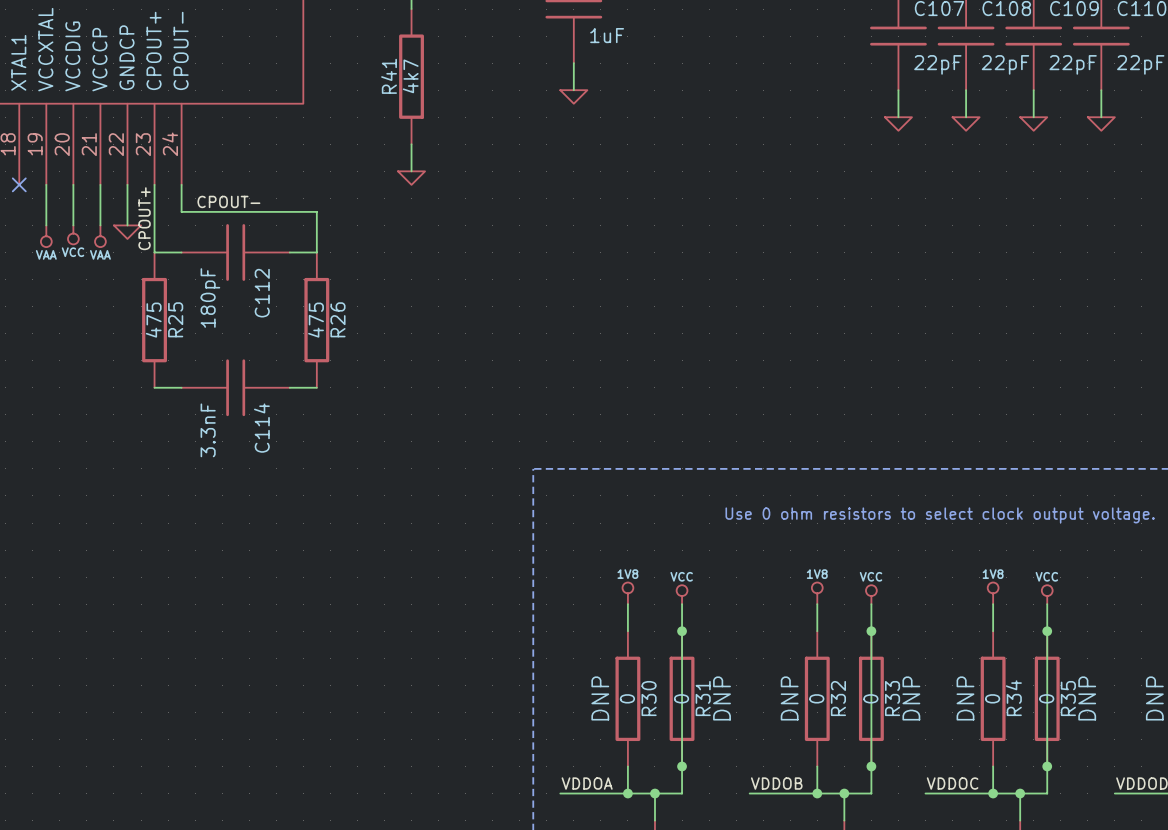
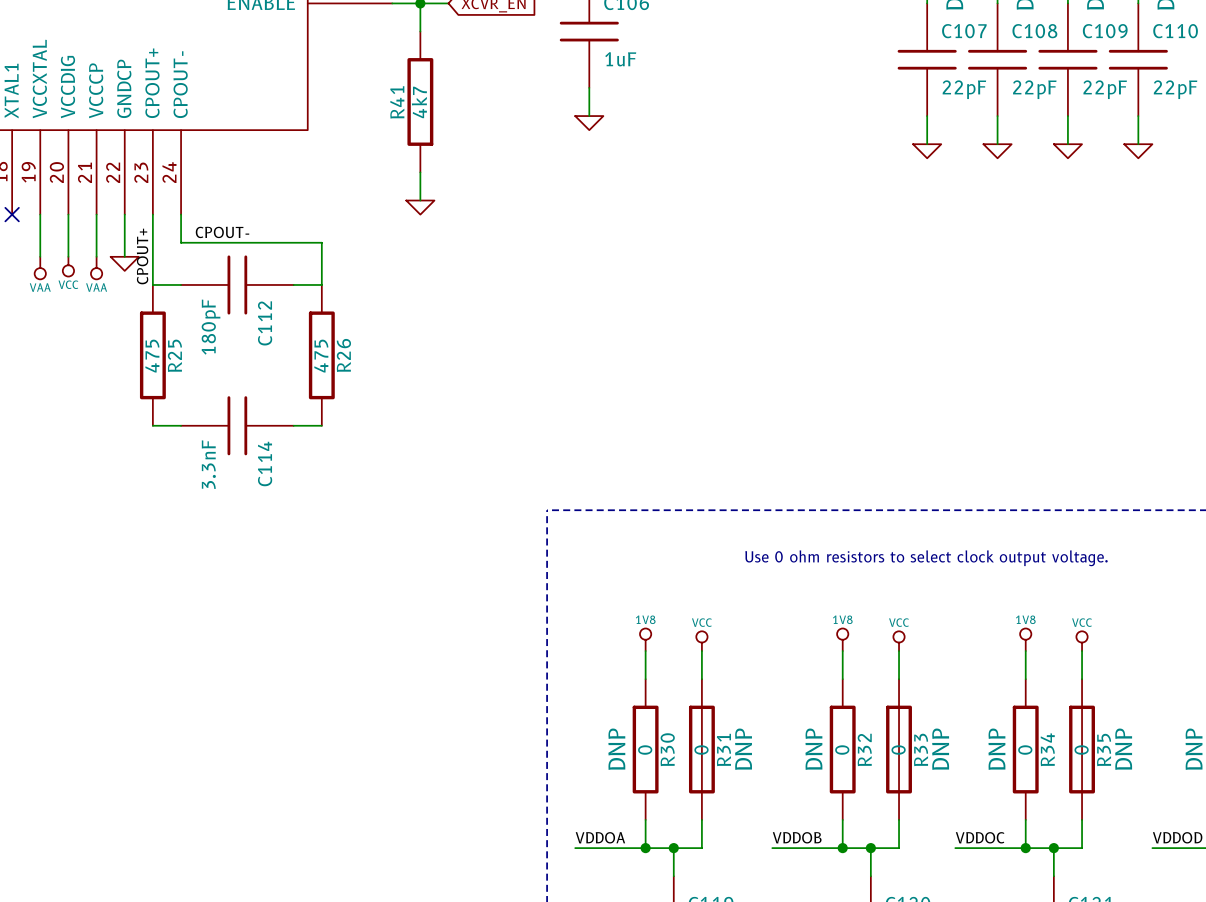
R31 symbol: [669, 631, 695, 767] -> [688, 679, 715, 820]
junction: (682, 631) -> none
R33 symbol: [858, 631, 884, 767] -> [886, 679, 912, 820]
junction: (871, 631) -> none
R35 symbol: [1034, 631, 1060, 767] -> [1069, 679, 1095, 820]
junction: (1047, 631) -> none
junction: (682, 766) -> none
junction: (871, 766) -> none
junction: (1047, 766) -> none

